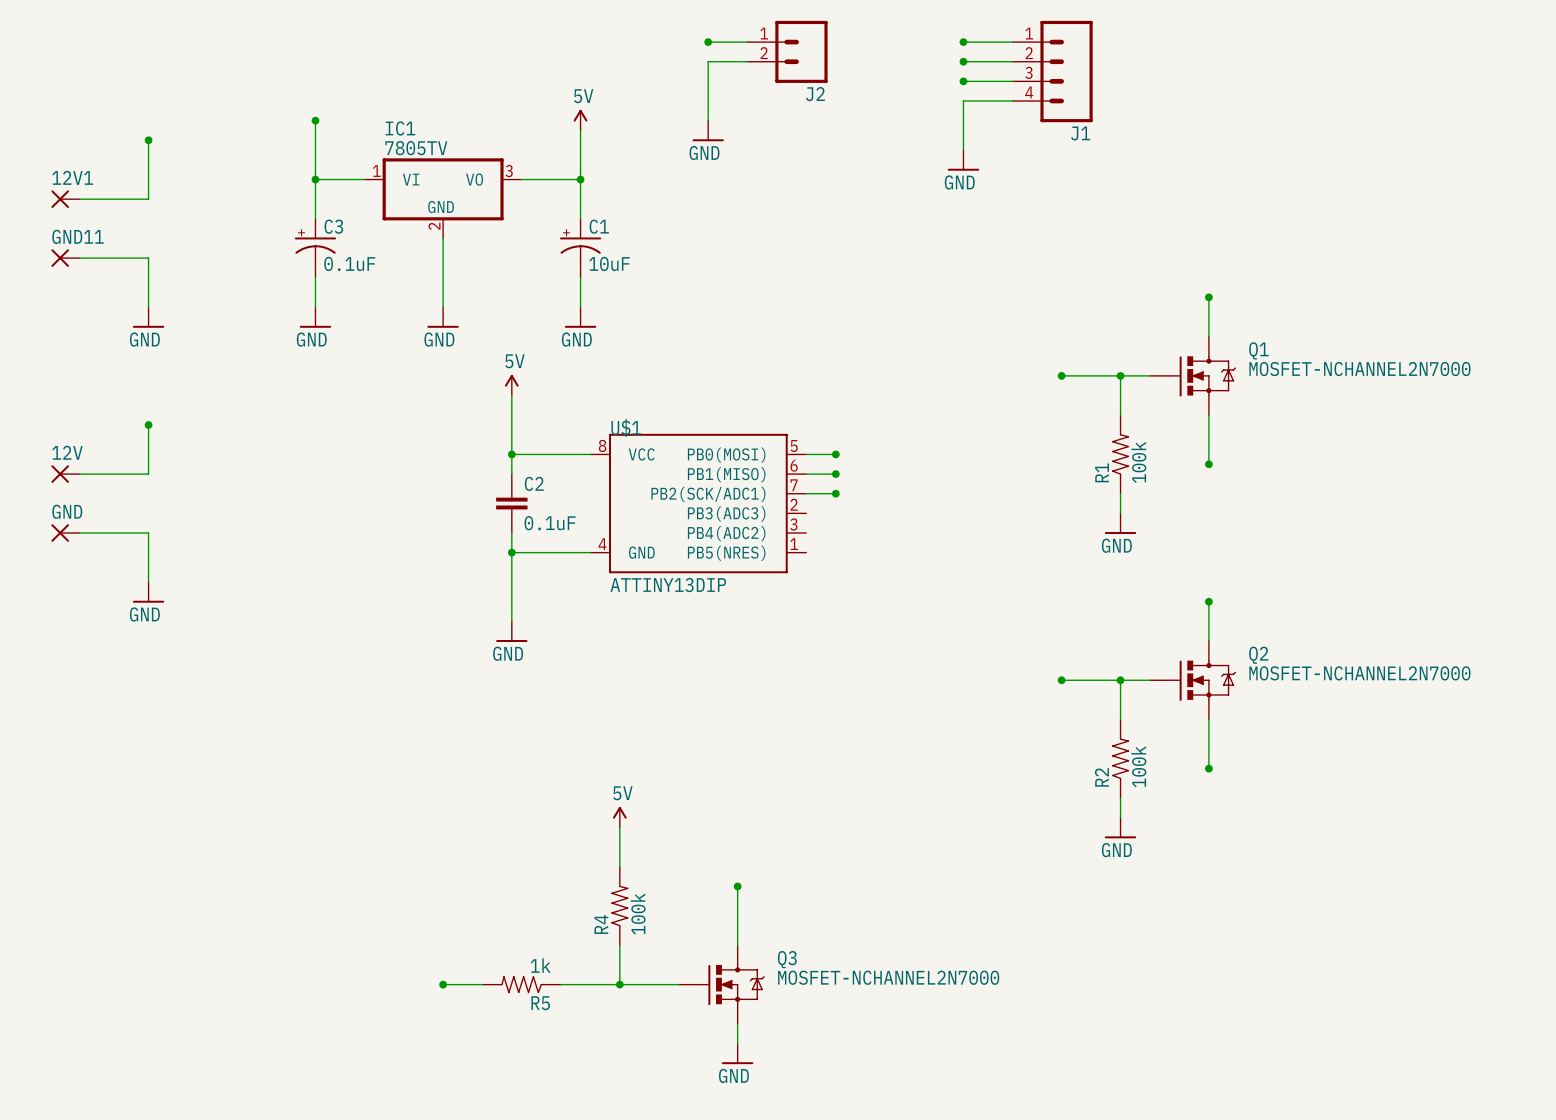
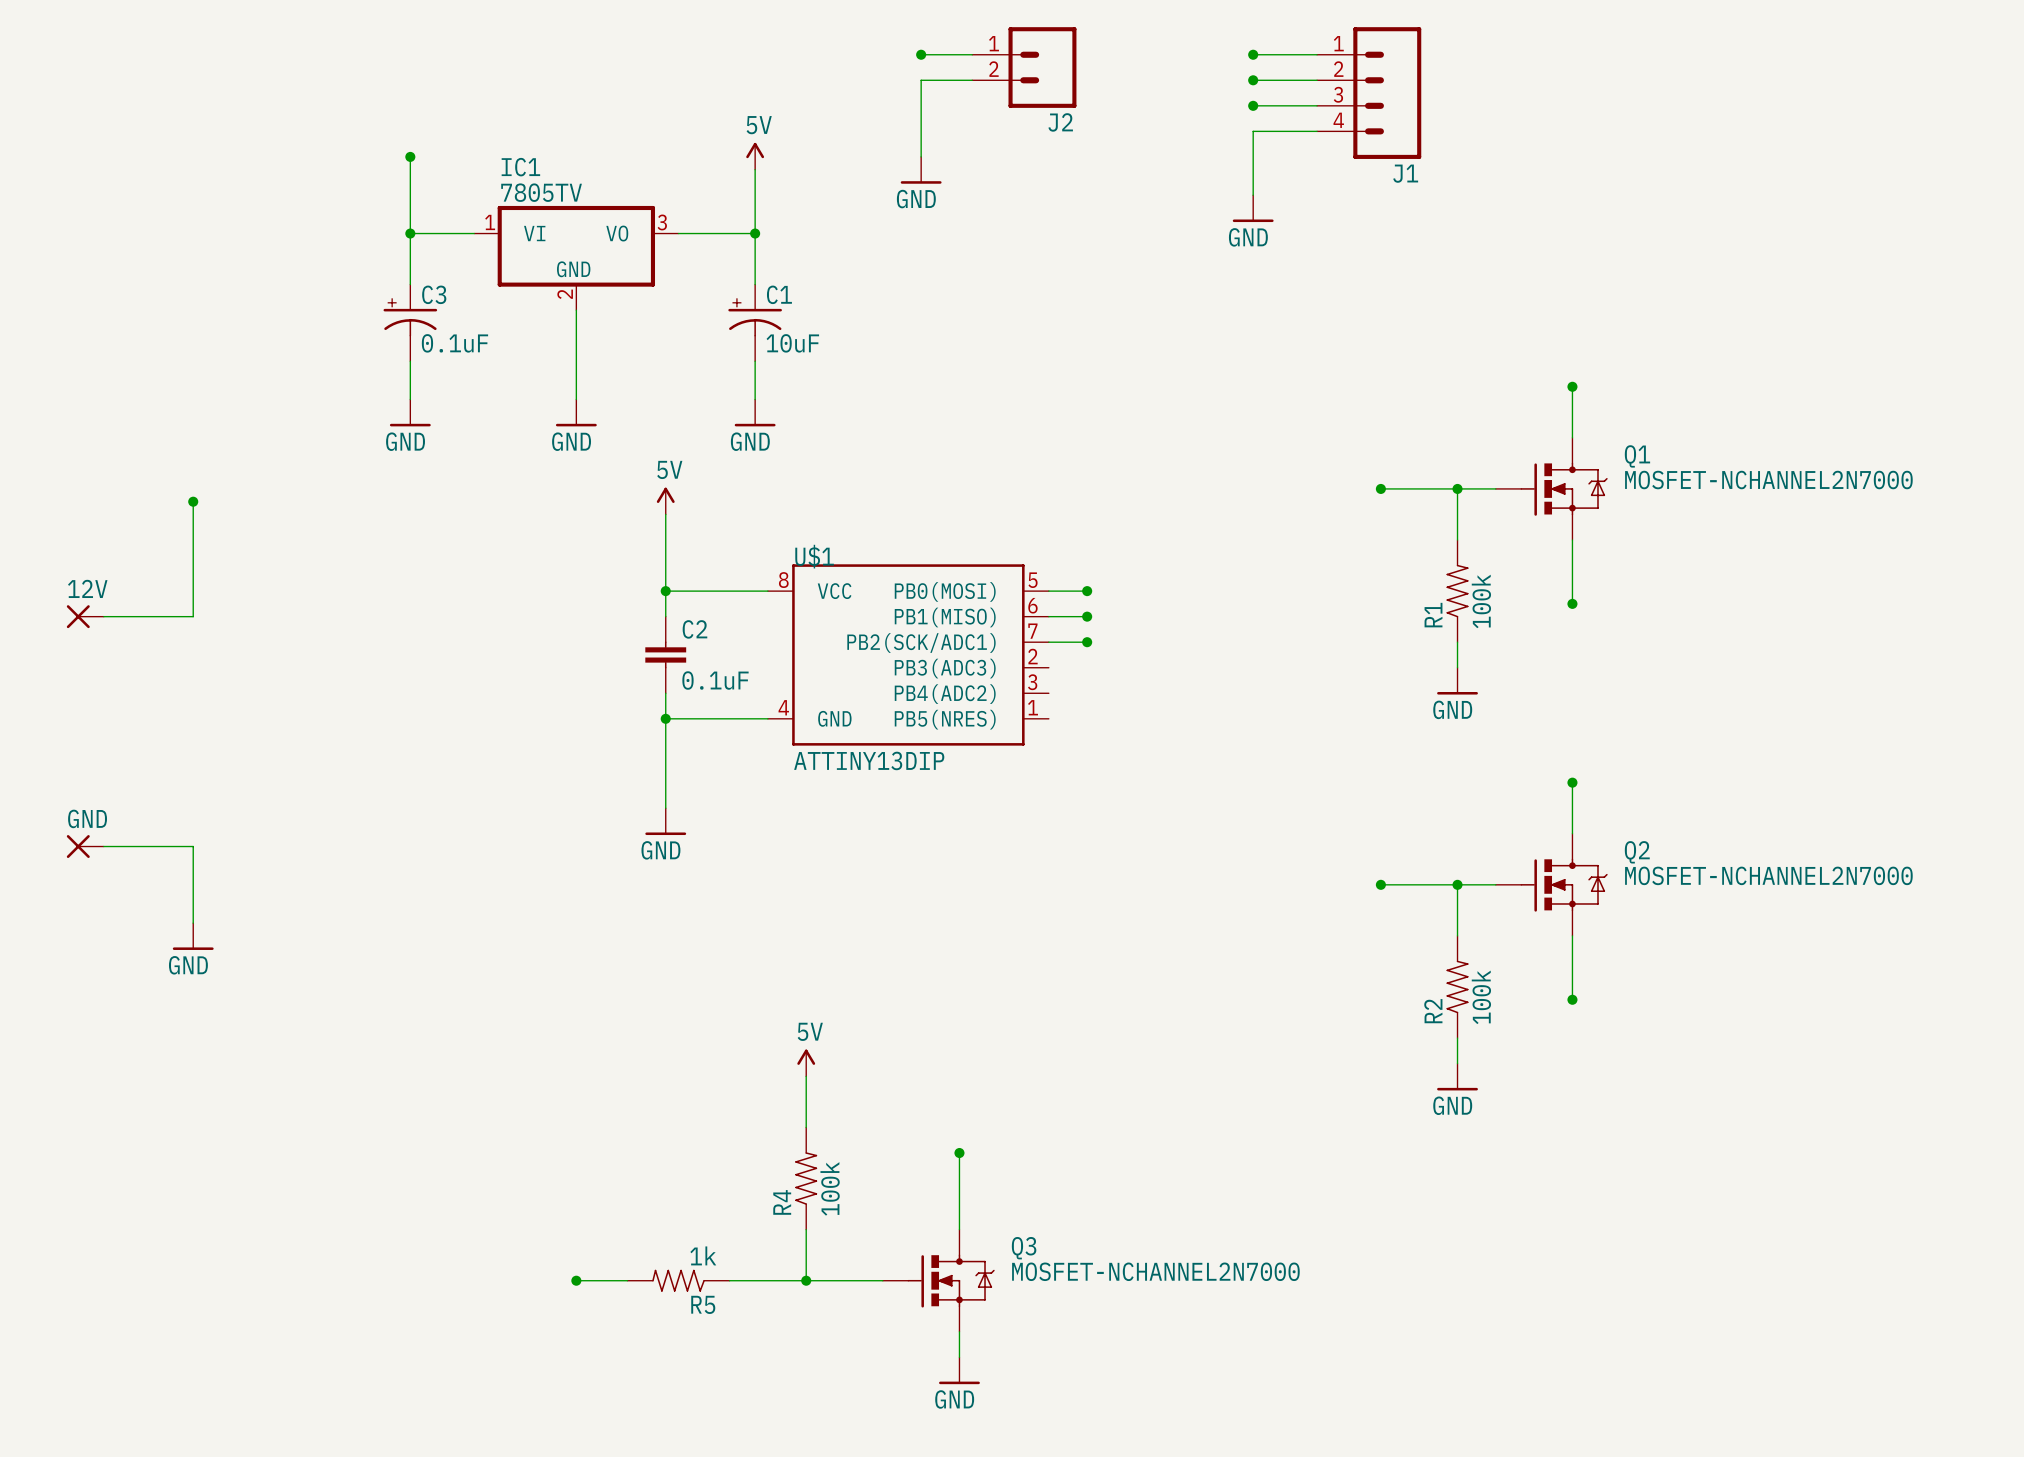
wire: (148, 140) (148, 199) (79, 199) -> none
junction: (148, 140) -> none
12V1: (65, 199) -> none
GND11: (65, 258) -> none
wire: (79, 258) (148, 258) (148, 307) -> none
power symbol: GND (148, 317) -> none
wire: none -> (193, 501) (193, 552)
junction position: (148, 424) -> (193, 501)
GND position: (65, 532) -> (85, 846)
wire: (79, 532) (148, 532) (148, 582) -> none
power symbol position: GND (148, 592) -> GND (193, 936)
wire: none -> (103, 846) (193, 846) (193, 923)

